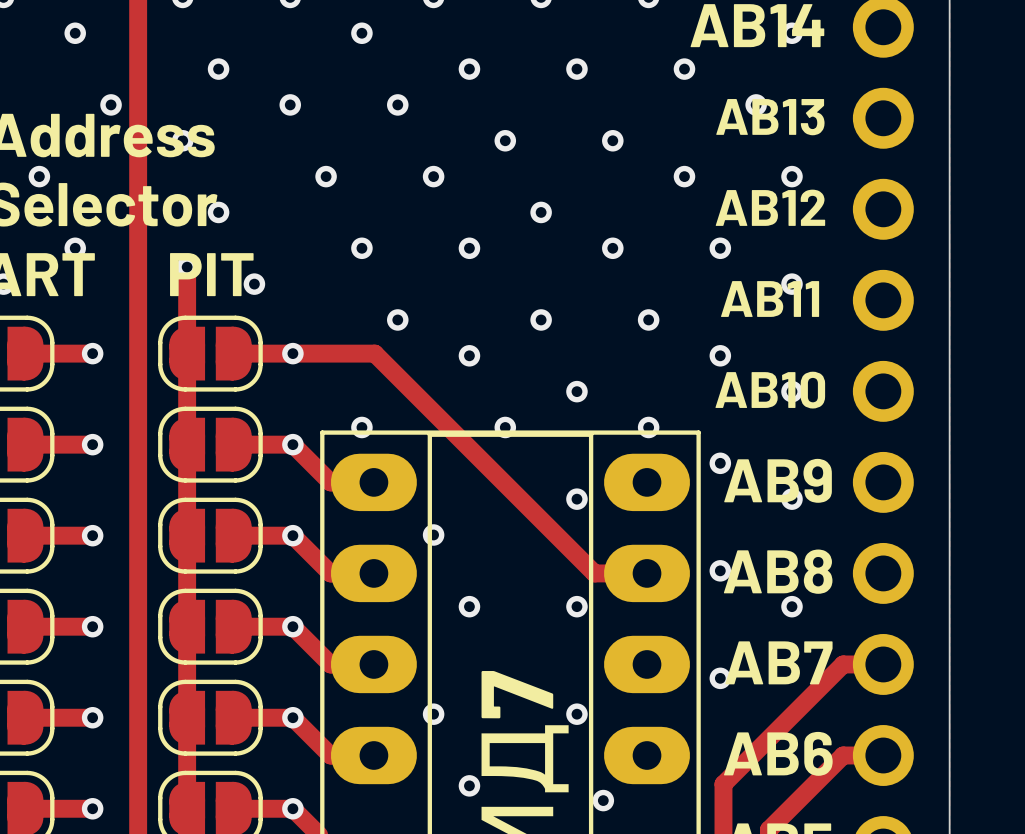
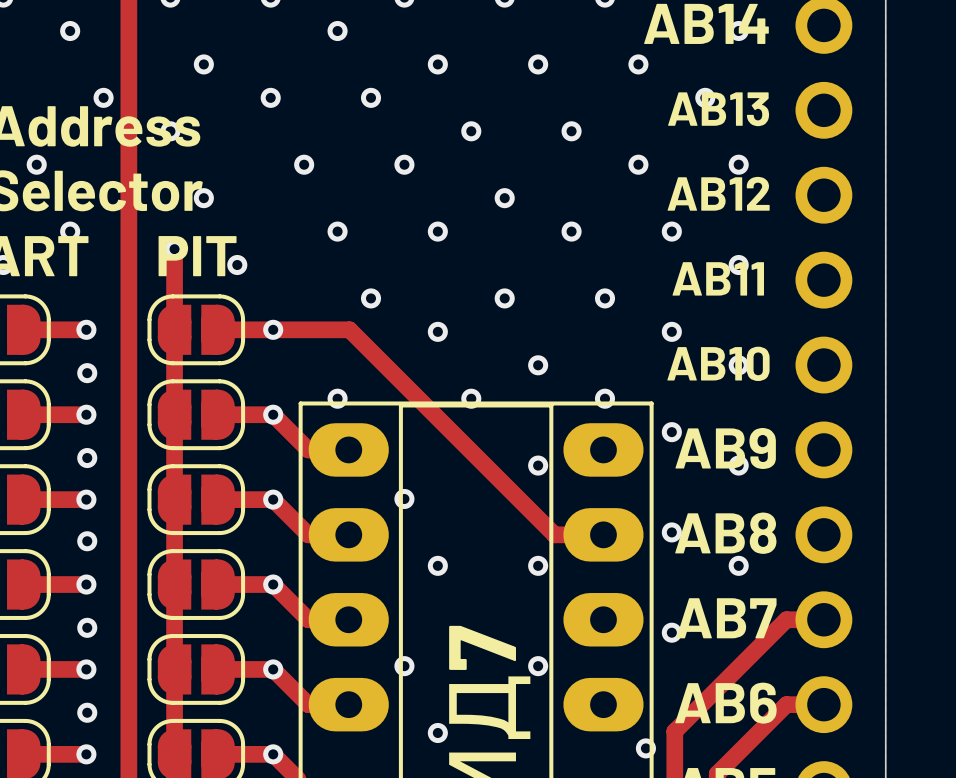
via: none -> (87, 373)
via: none -> (87, 458)
via: none -> (87, 541)
via: none -> (87, 627)
via: none -> (87, 712)
via position: (603, 800) -> (645, 748)

